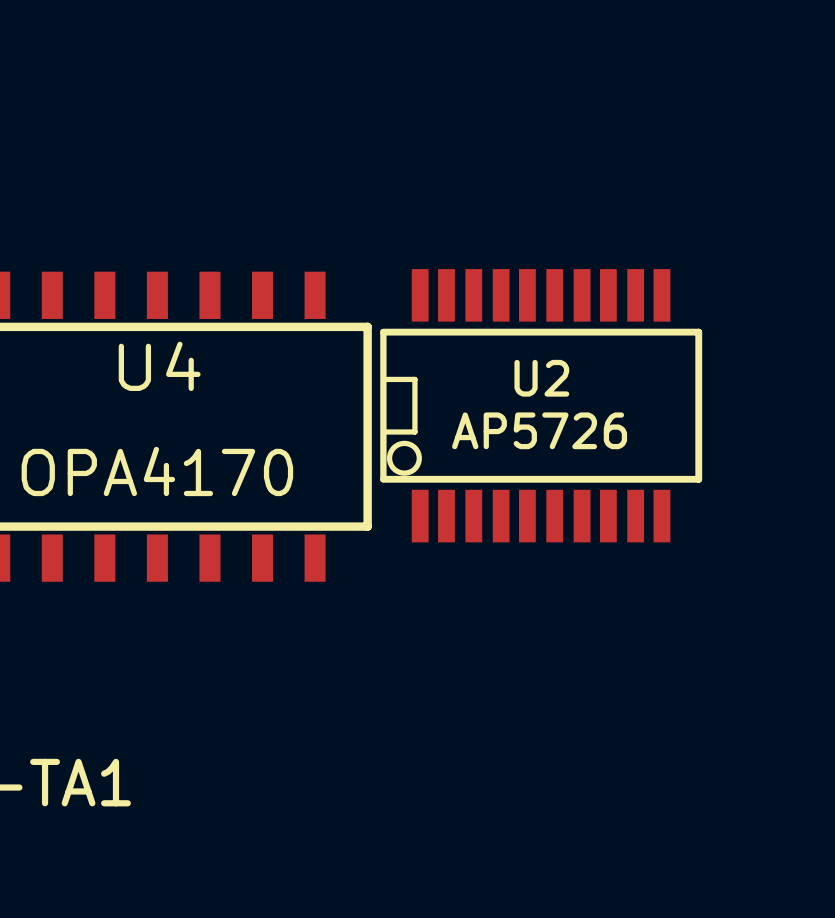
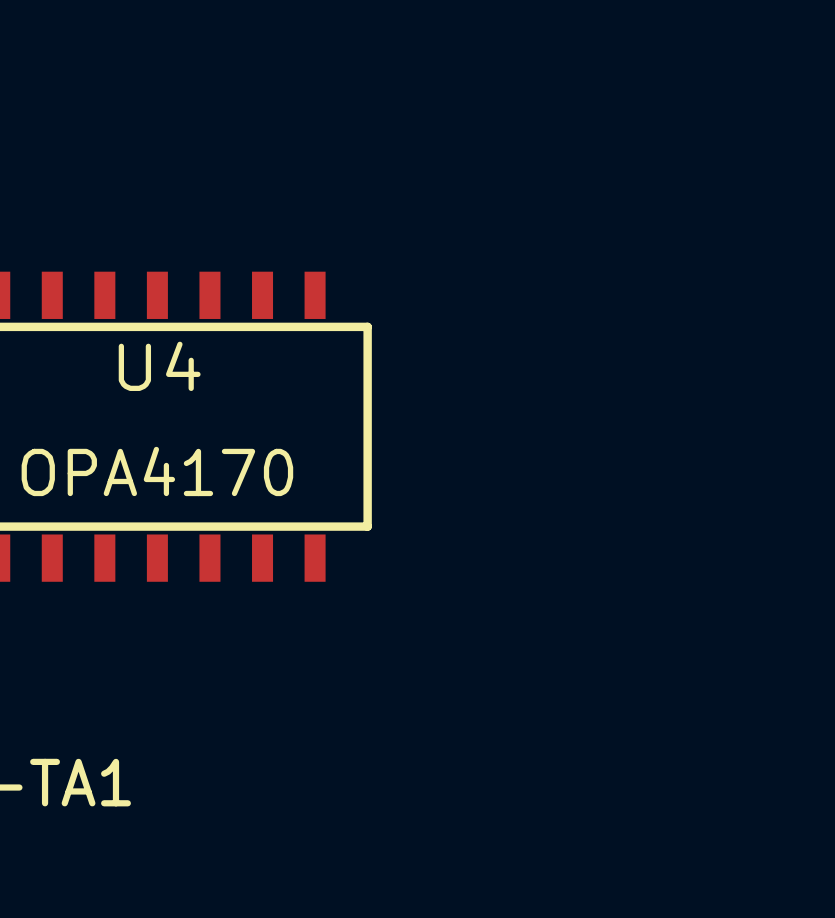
U2: AP5726 (541, 405) -> none

